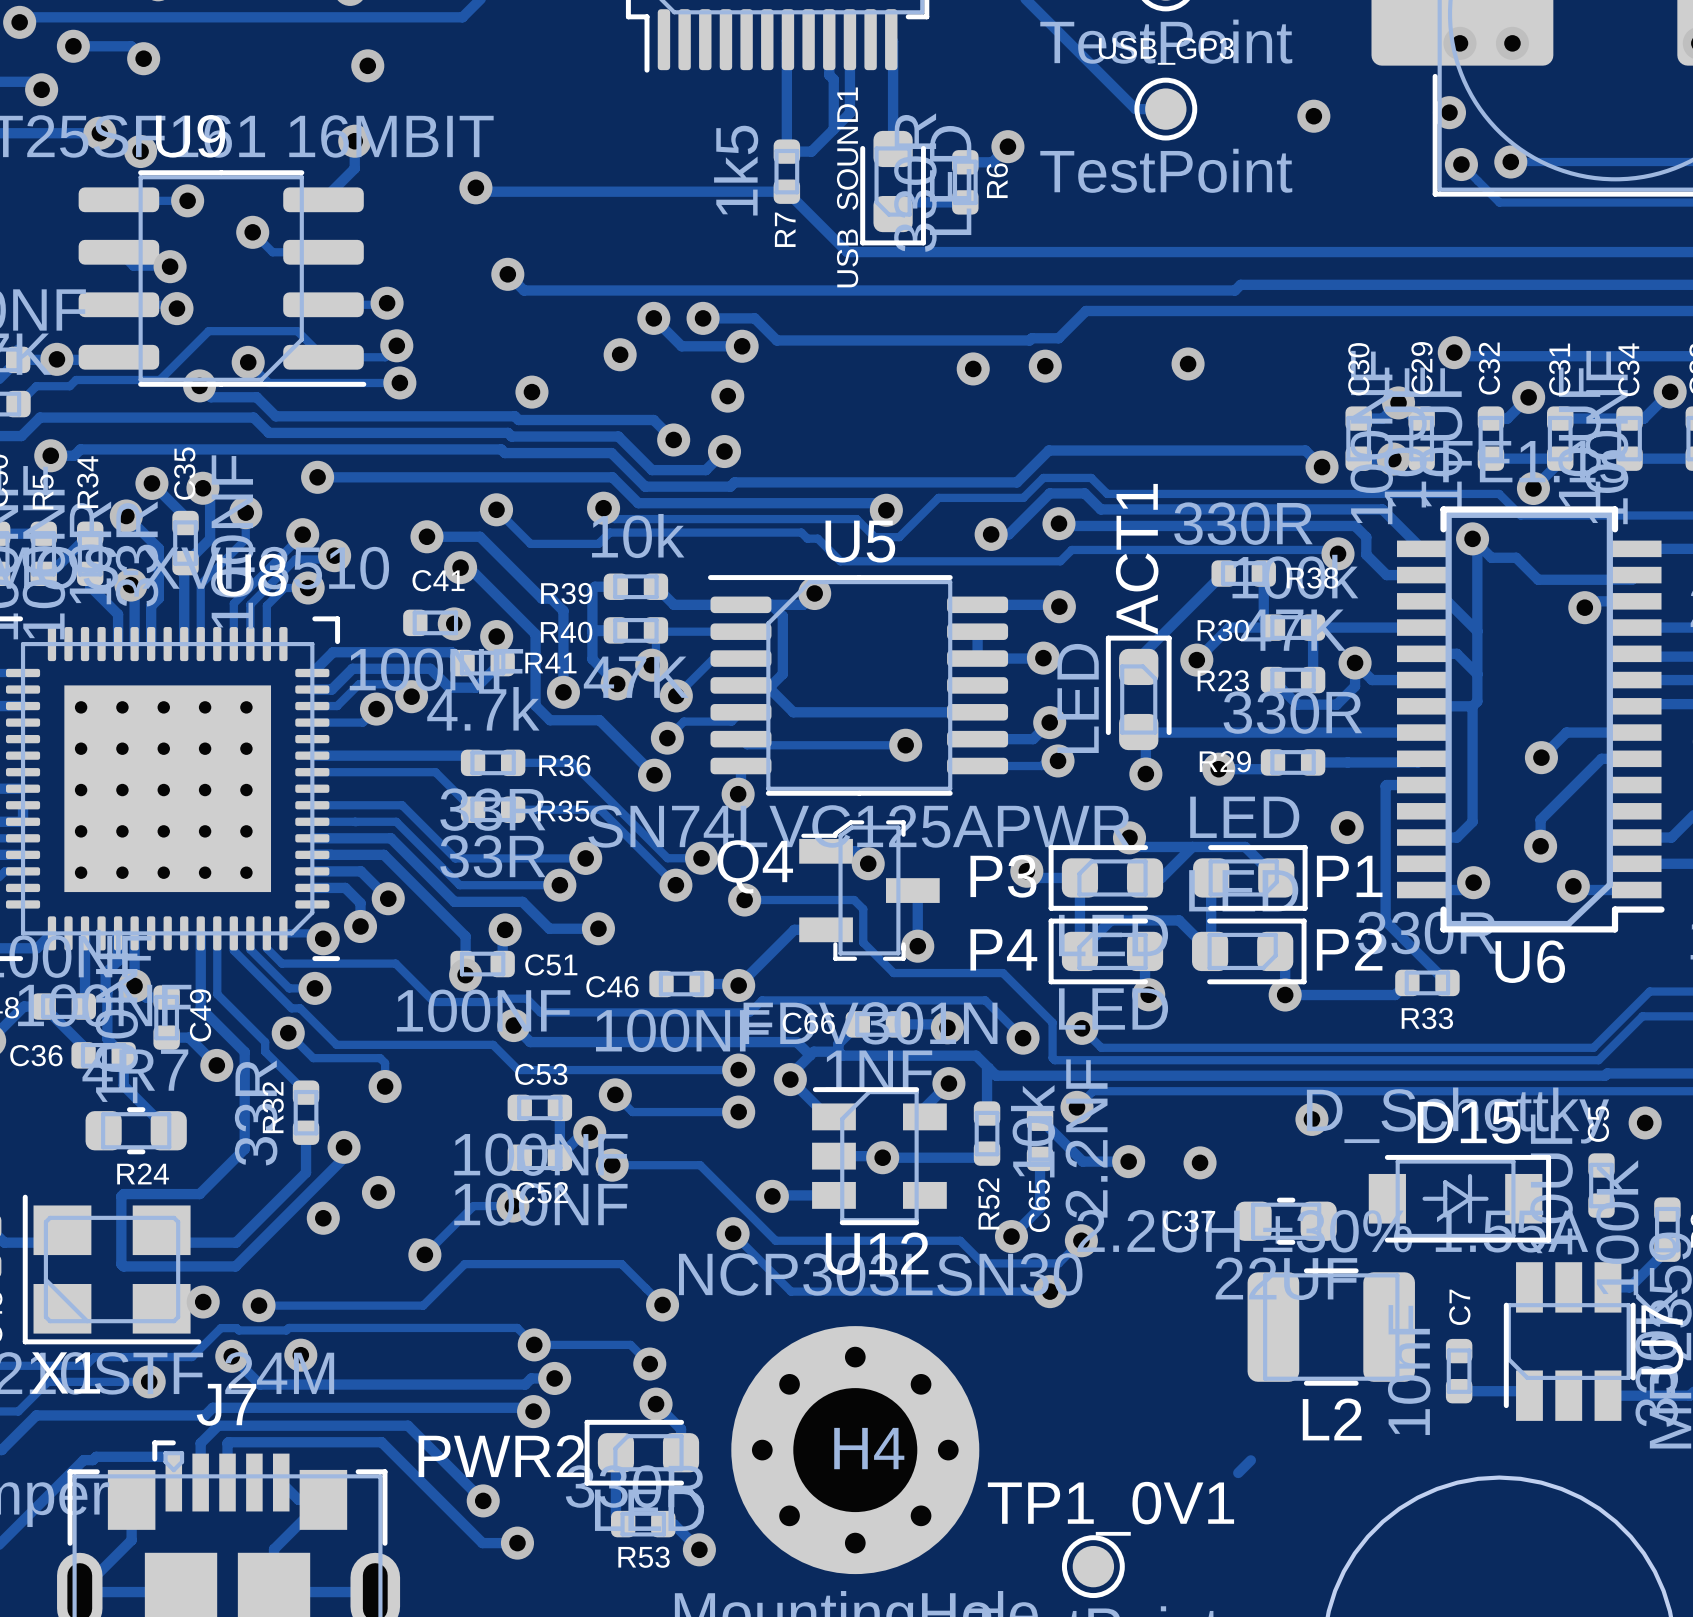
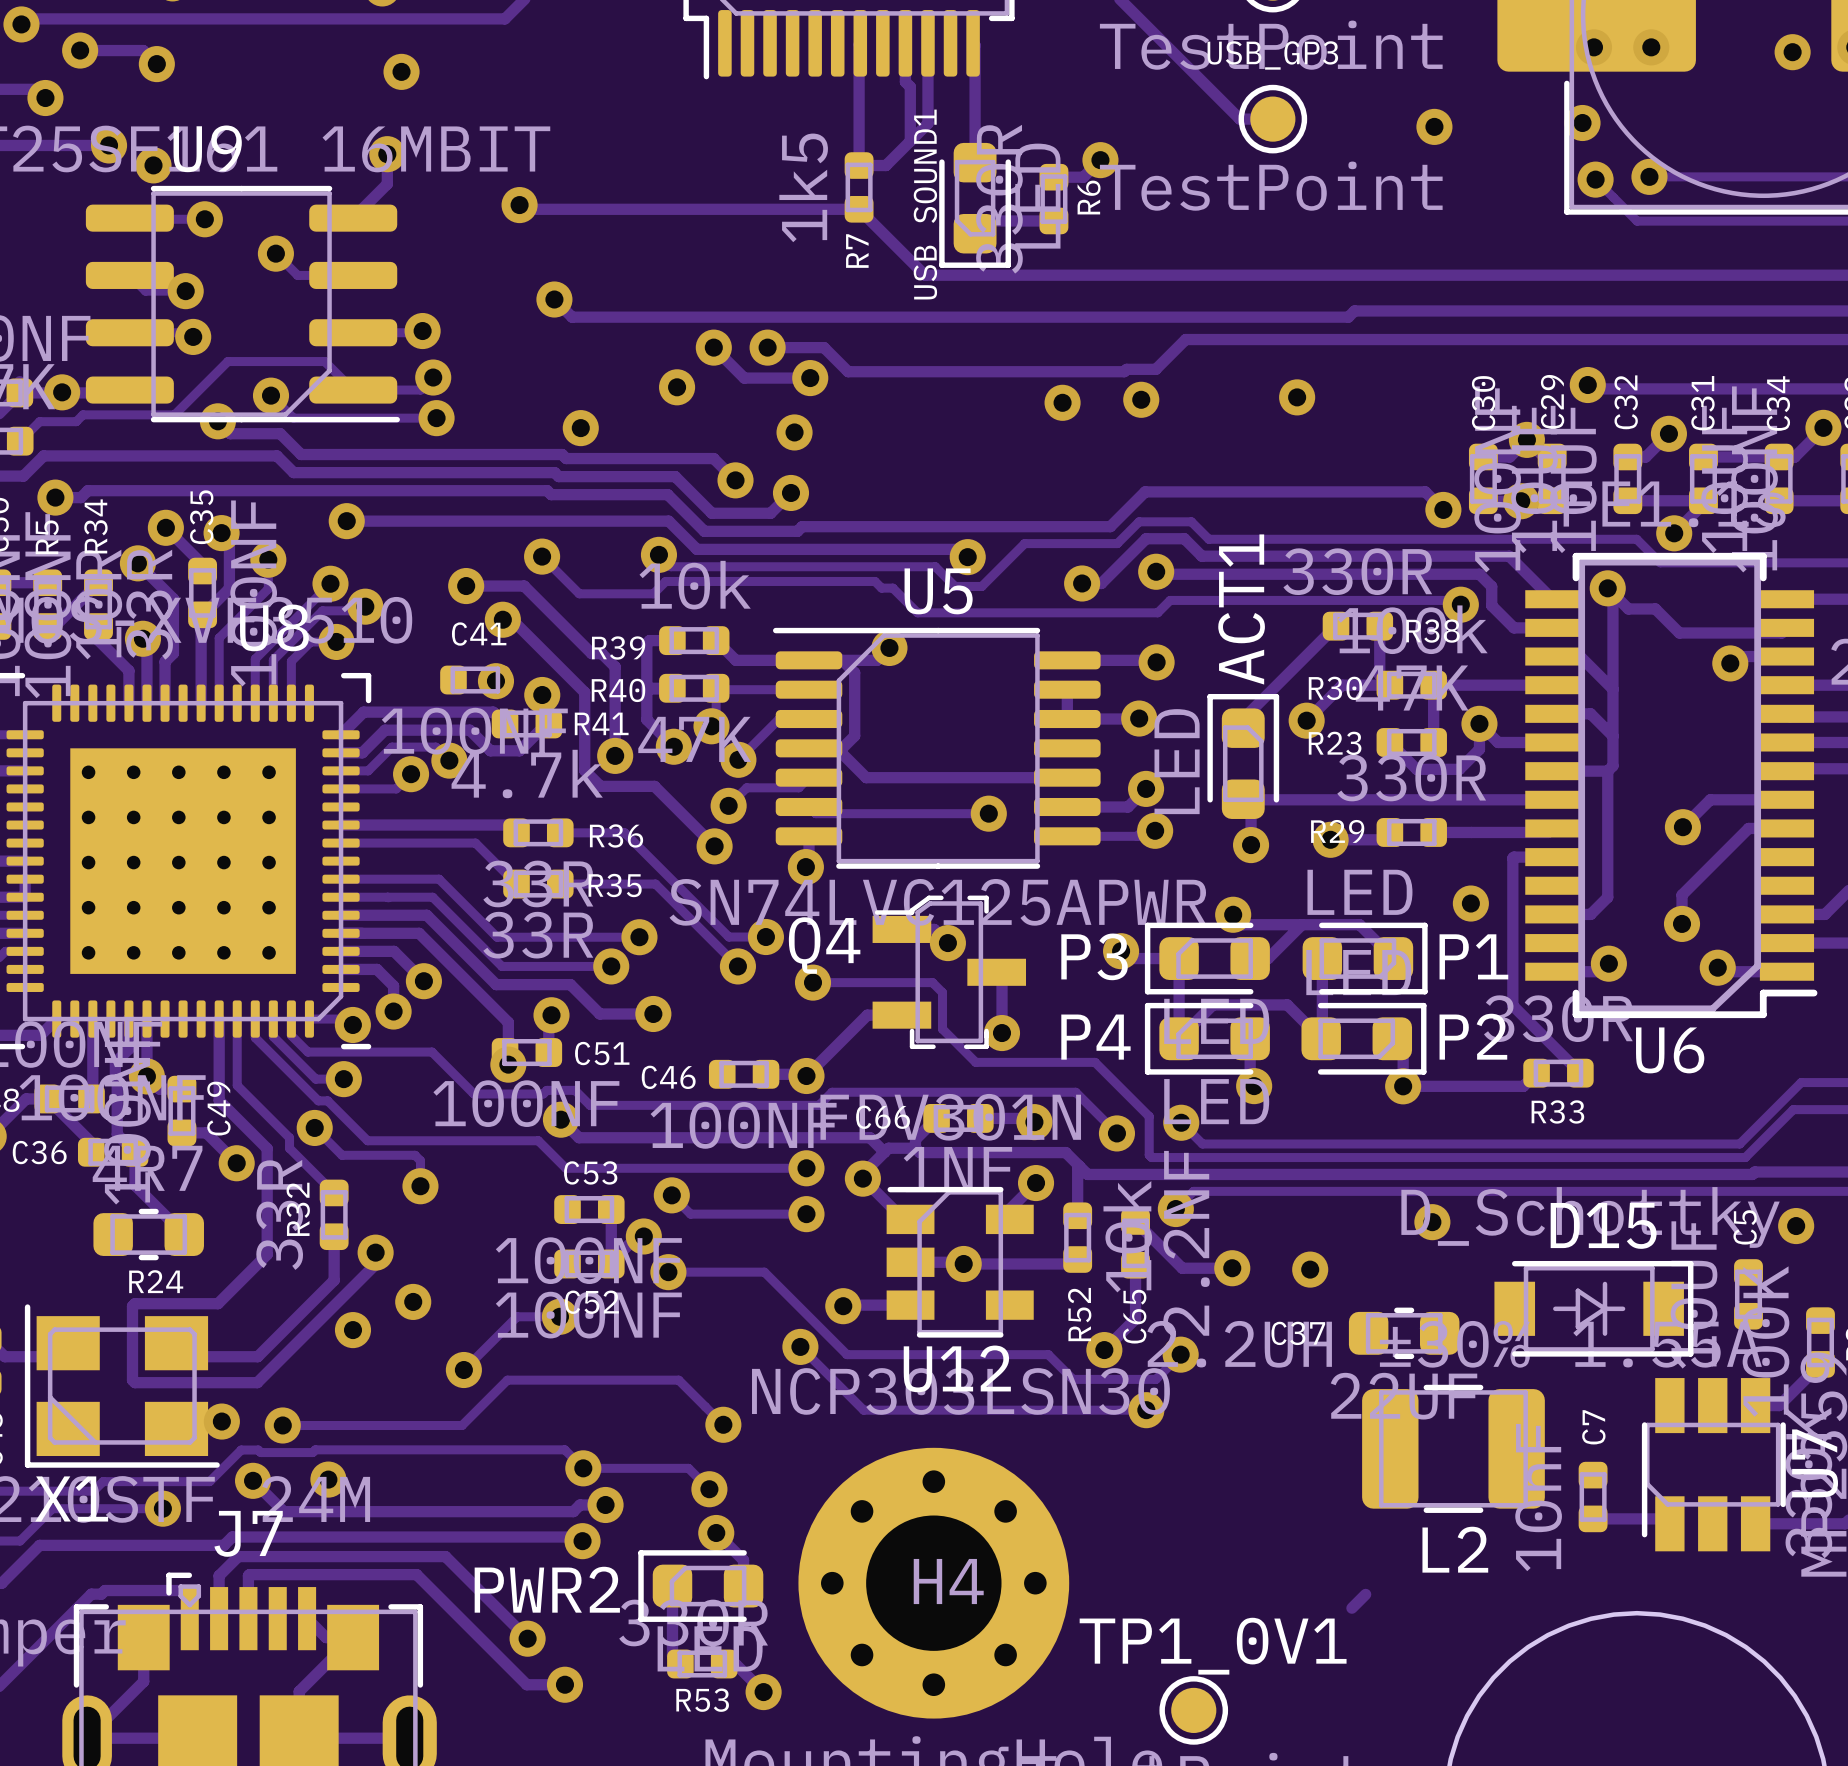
via: none -> (1792, 52)

